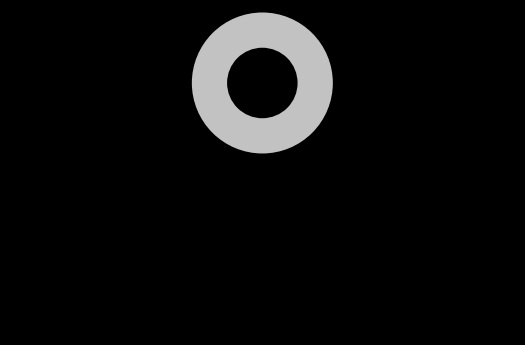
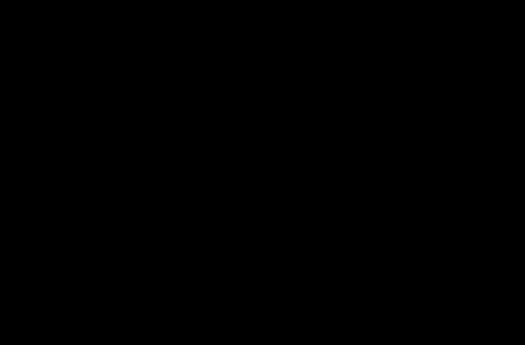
via: (262, 82) -> none

